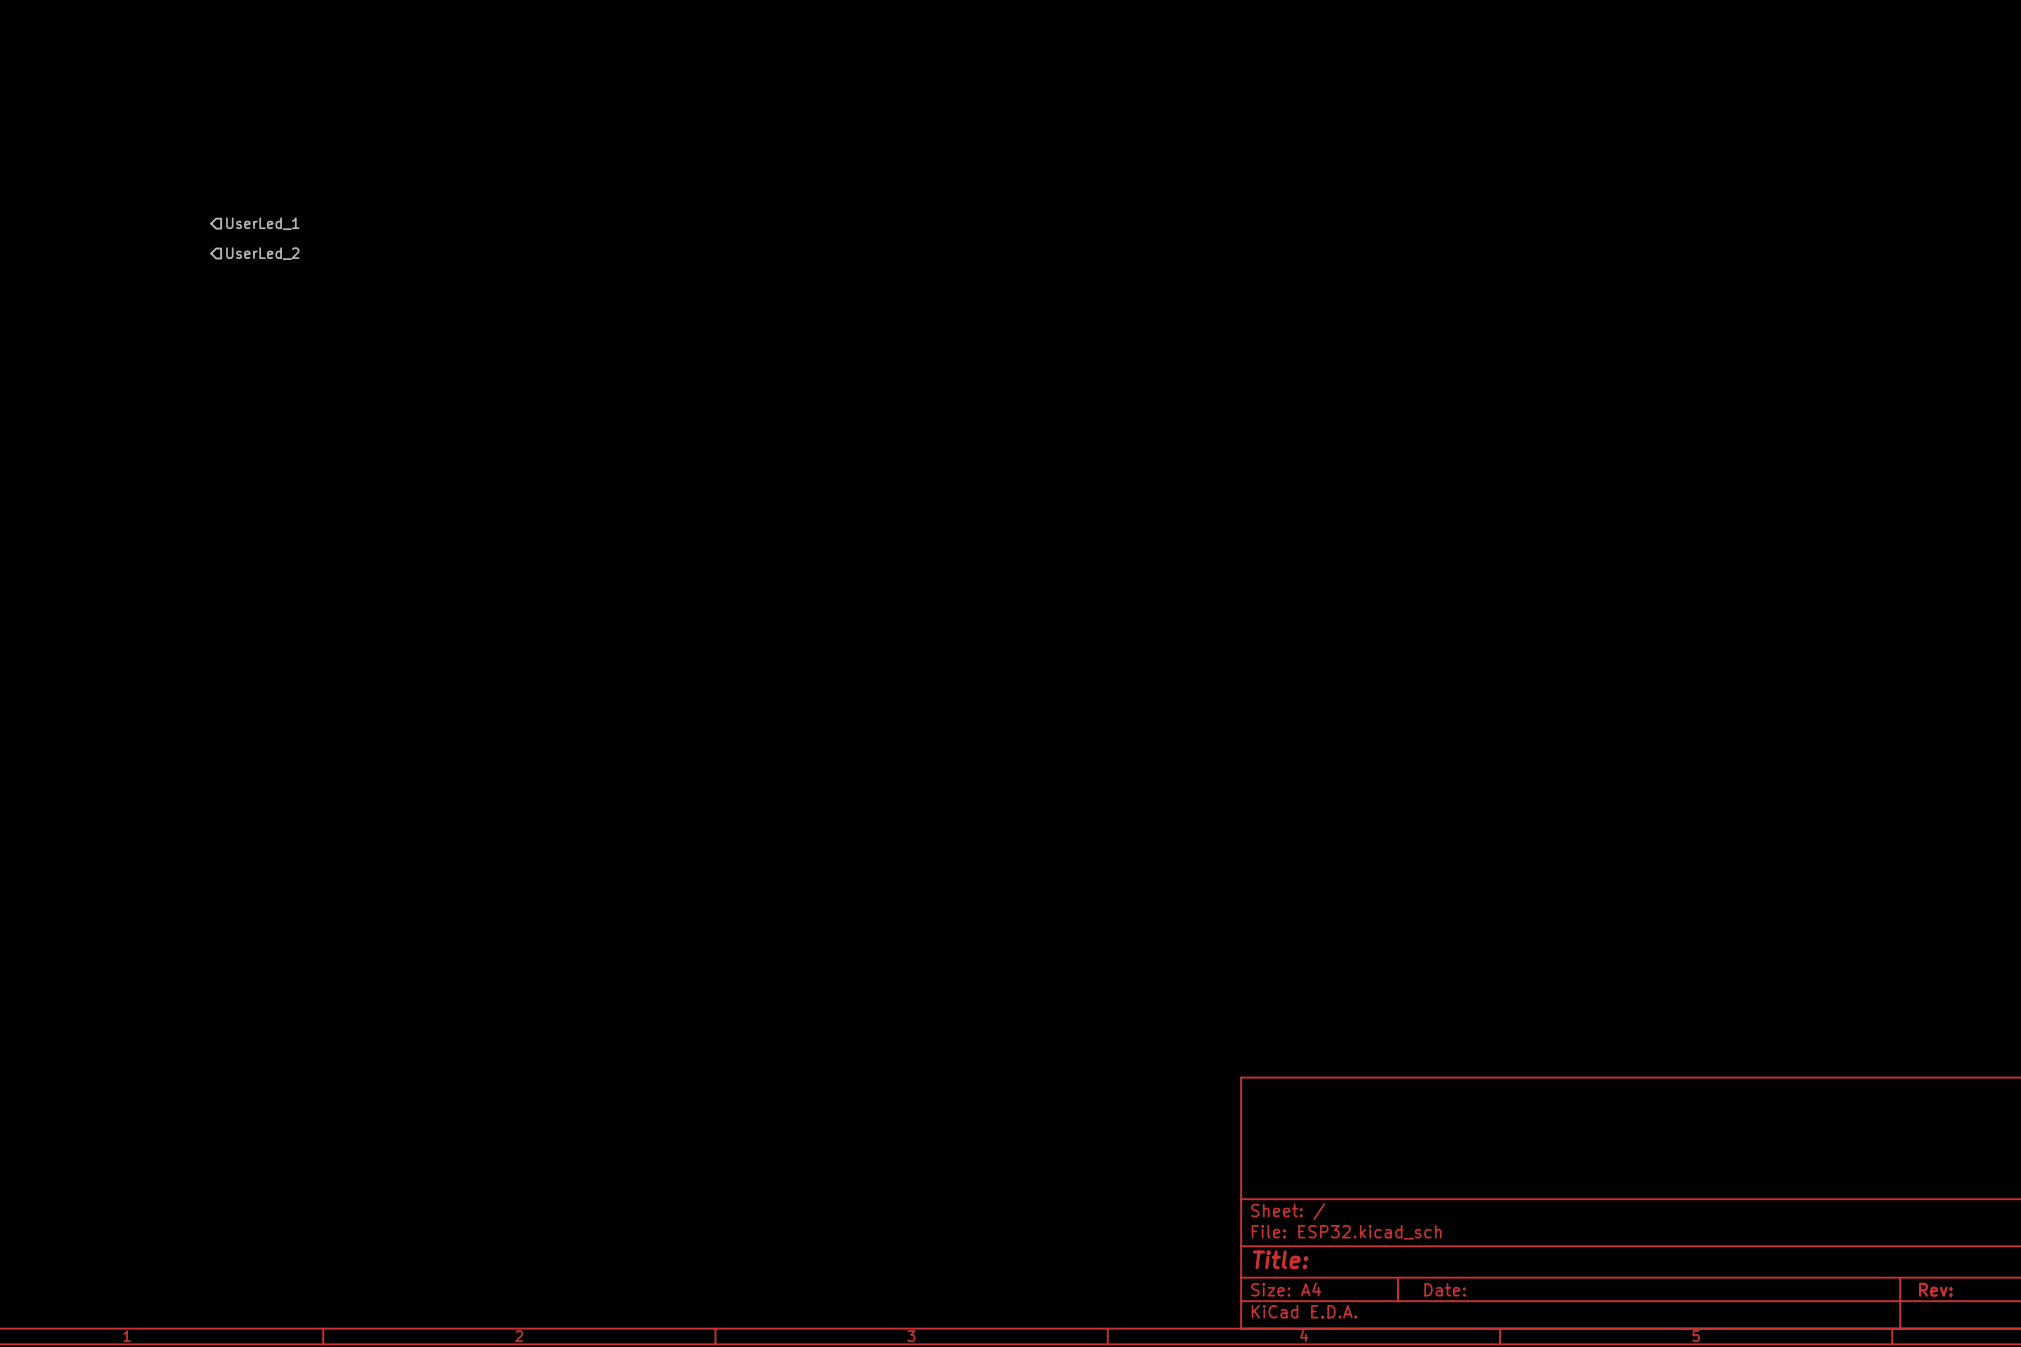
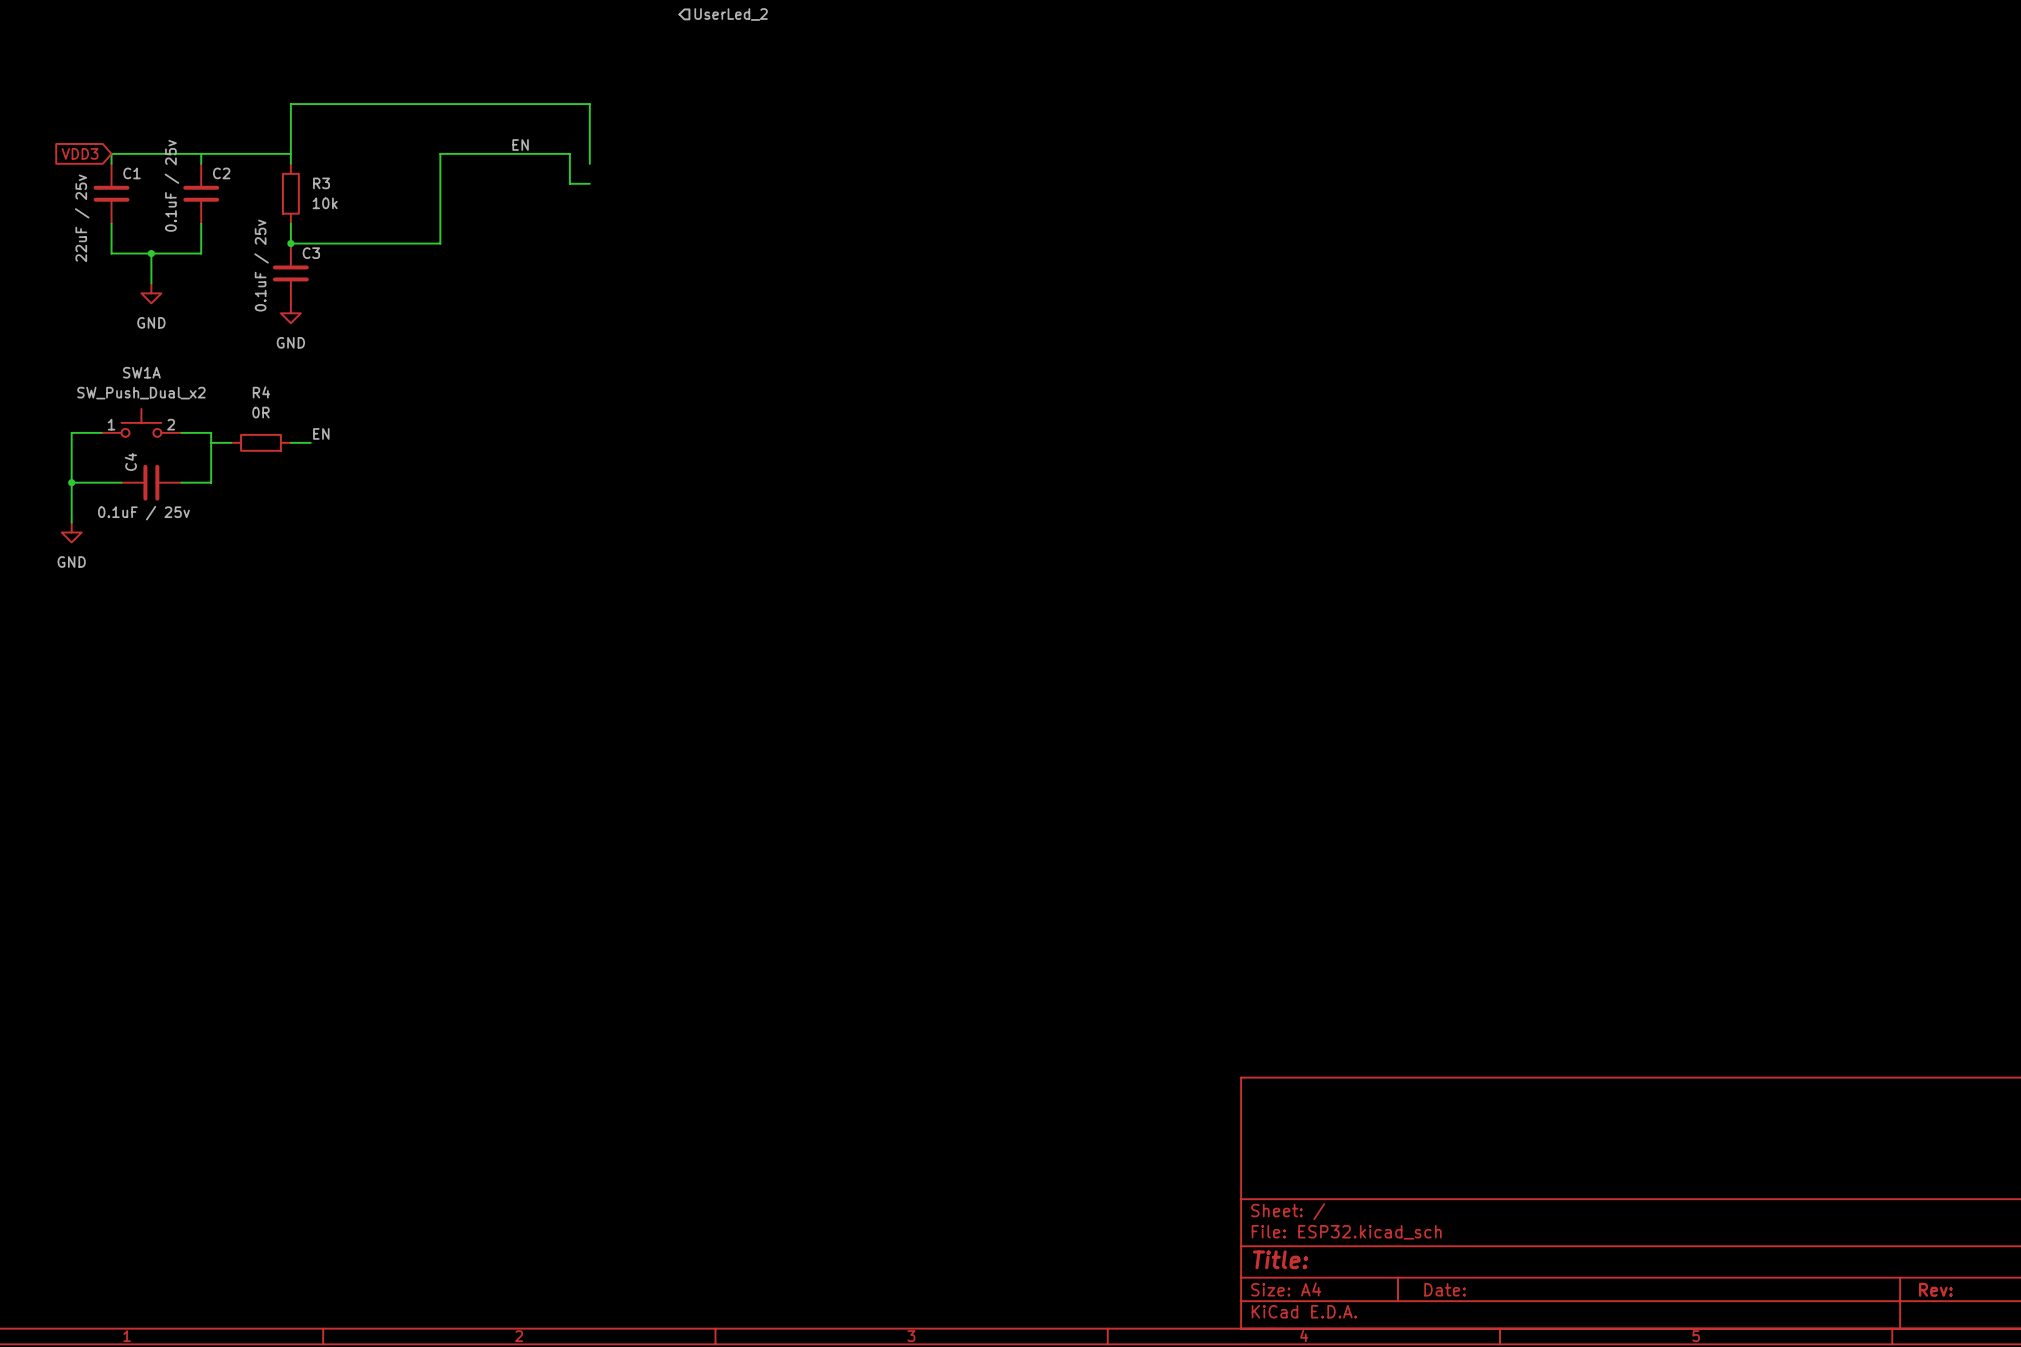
hierarchical label: none -> UserLed_2 (731, 14)
label: none -> EN (520, 144)
global label: none -> VDD3 (80, 153)
wire: none -> (201, 153) (201, 163)
wire: none -> (290, 153) (111, 153) (111, 163)
wire: none -> (290, 163) (290, 104) (589, 104) (589, 163)
wire: none -> (589, 183) (569, 183) (569, 153) (440, 153) (440, 243) (290, 243) (290, 223)
C1: none -> 22uF / 25v (111, 193)
C2: none -> 0.1uF / 25v (201, 193)
R3: none -> 10k (290, 193)
wire: none -> (111, 223) (111, 253) (201, 253) (201, 223)
hierarchical label: UserLed_1 (262, 223) -> none
junction: none -> (290, 243)
wire: none -> (151, 253) (151, 283)
junction: none -> (151, 253)
hierarchical label: UserLed_2 (262, 253) -> none
C3: none -> 0.1uF / 25v (290, 273)
power symbol: none -> GND (151, 293)
power symbol: none -> GND (290, 313)
SW1A: none -> SW_Push_Dual_x2 (141, 422)
wire: none -> (101, 432) (71, 432) (71, 522)
wire: none -> (181, 432) (211, 432) (211, 482) (181, 482)
label: none -> EN (321, 433)
wire: none -> (211, 442) (231, 442)
R4: none -> 0R (260, 442)
wire: none -> (290, 442) (310, 442)
wire: none -> (71, 482) (121, 482)
junction: none -> (71, 482)
C4: none -> 0.1uF / 25v (151, 482)
power symbol: none -> GND (71, 532)

